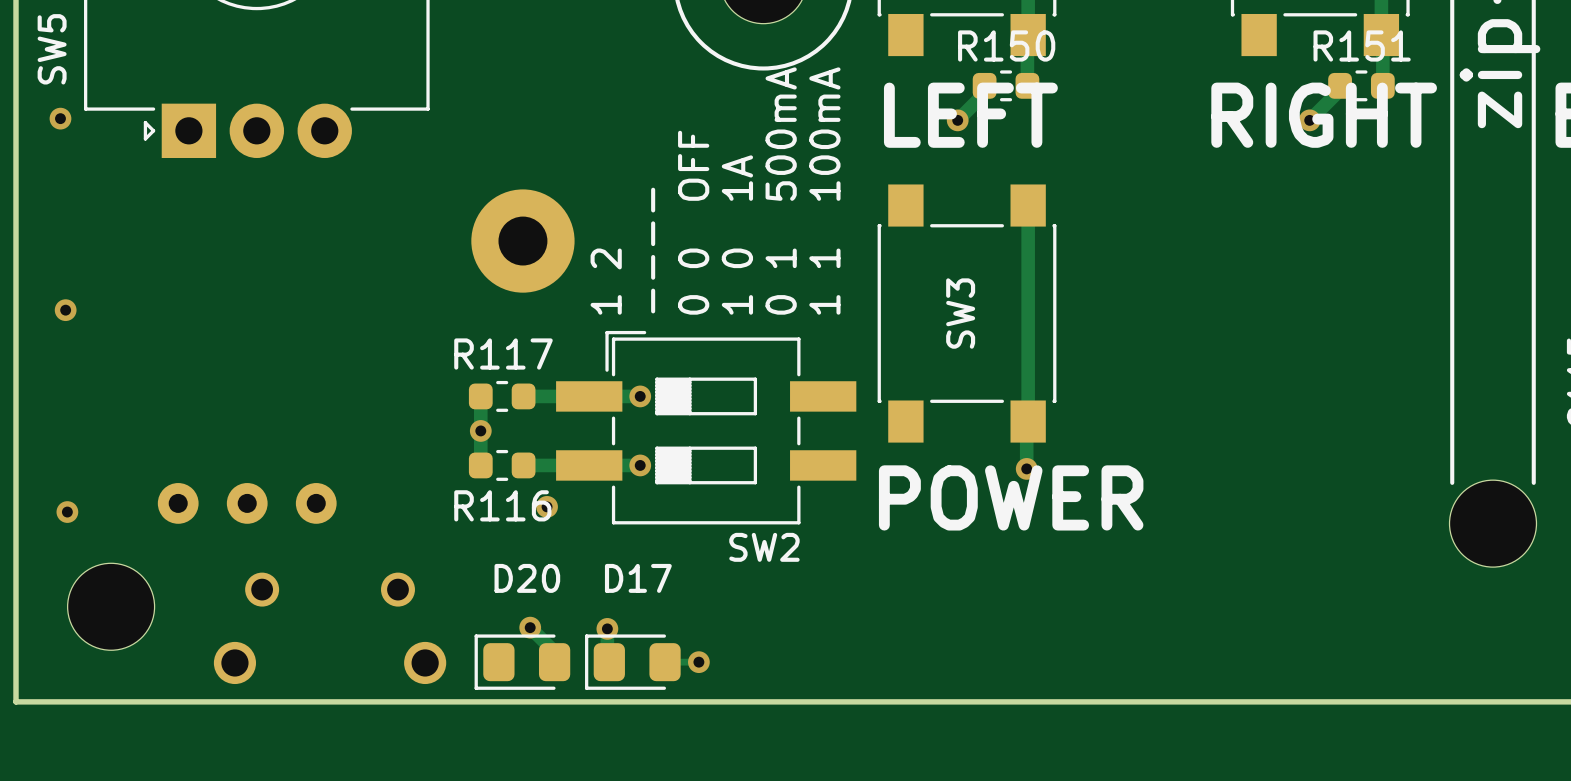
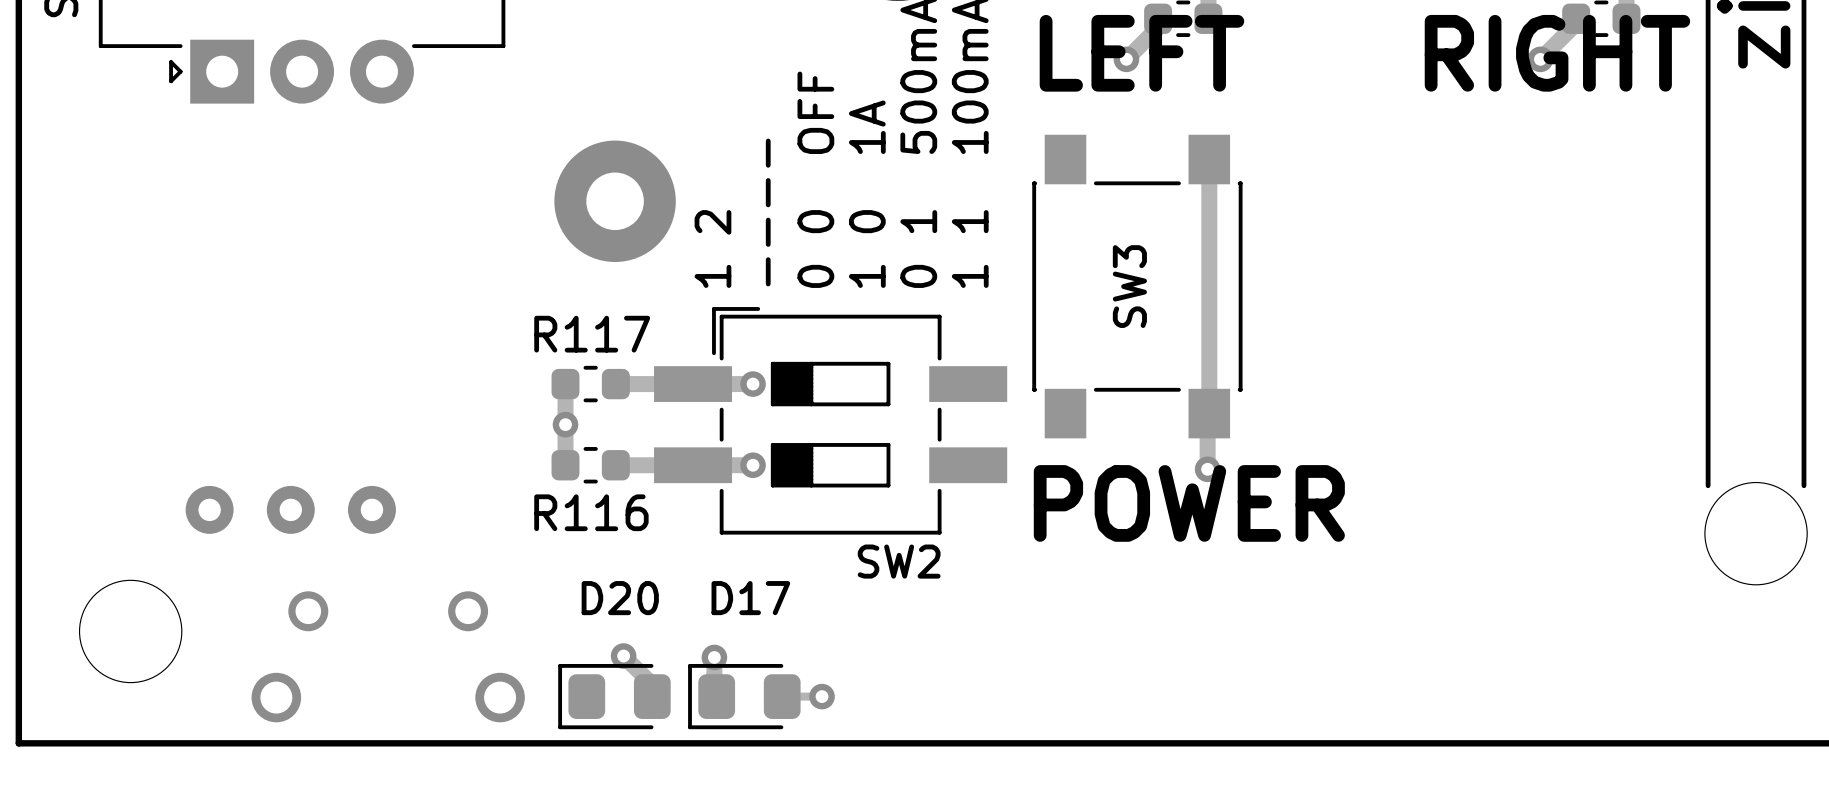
via: (60, 118) -> none
via: (65, 310) -> none
via: (547, 506) -> none
via: (67, 512) -> none

